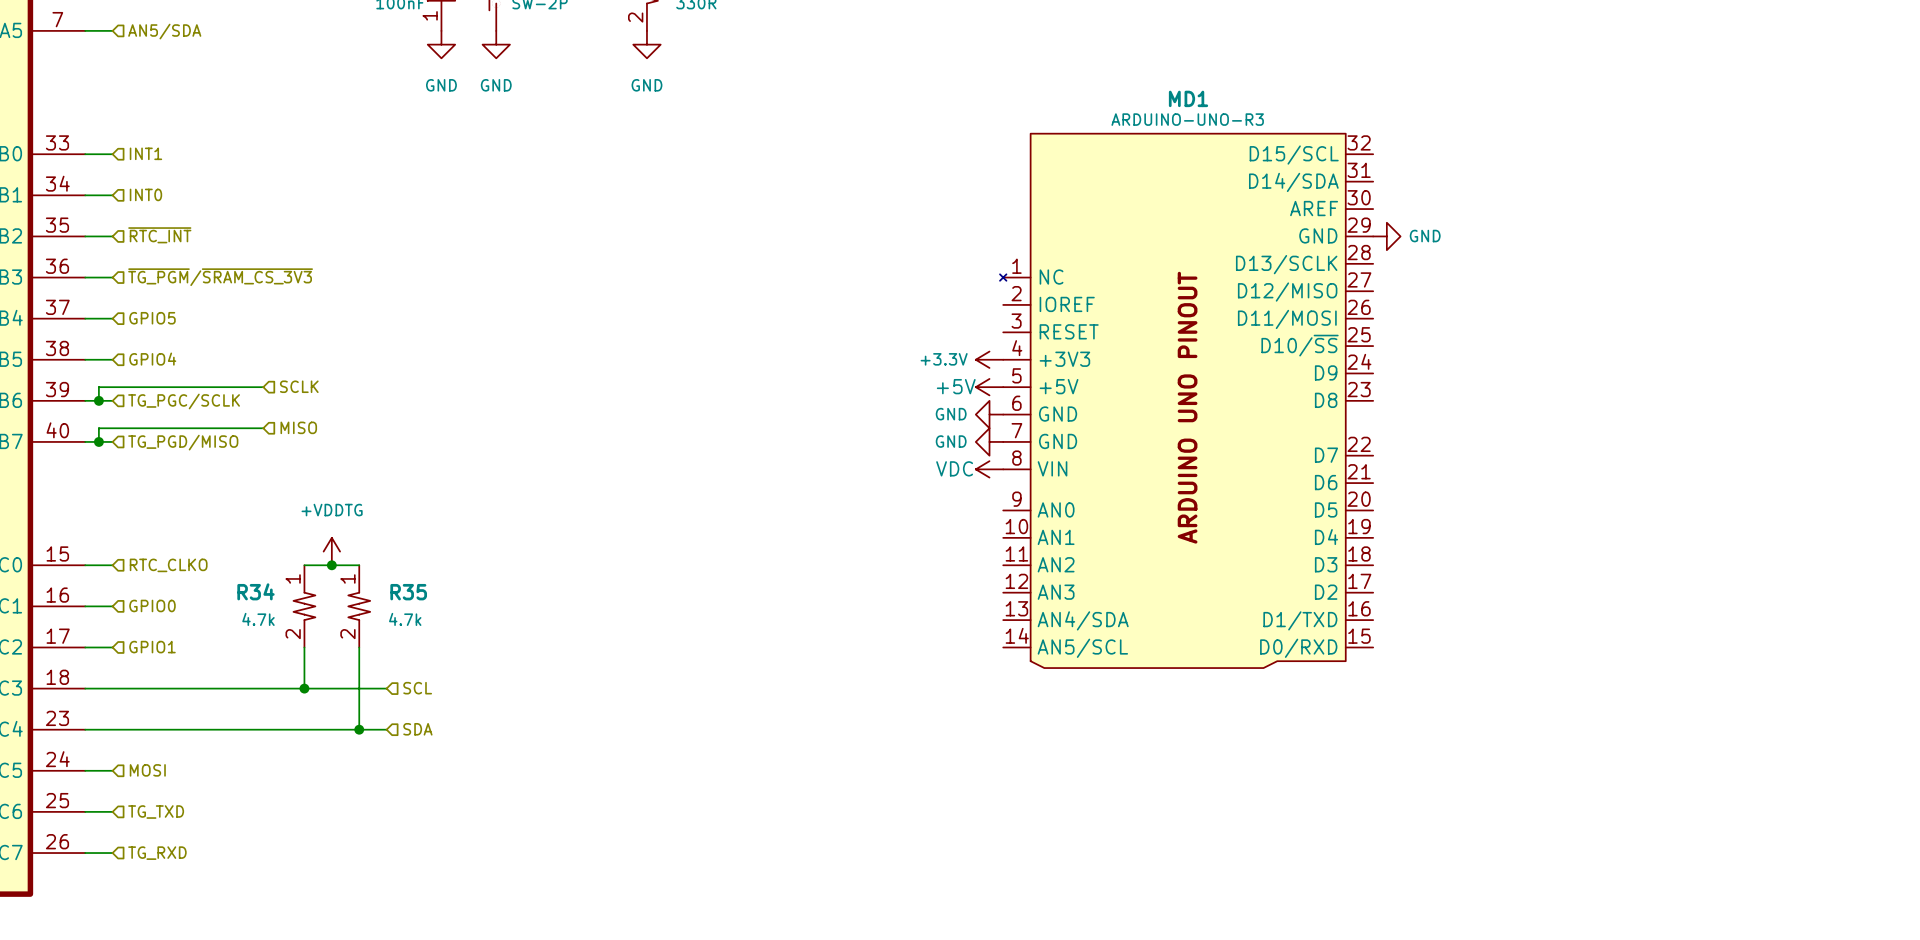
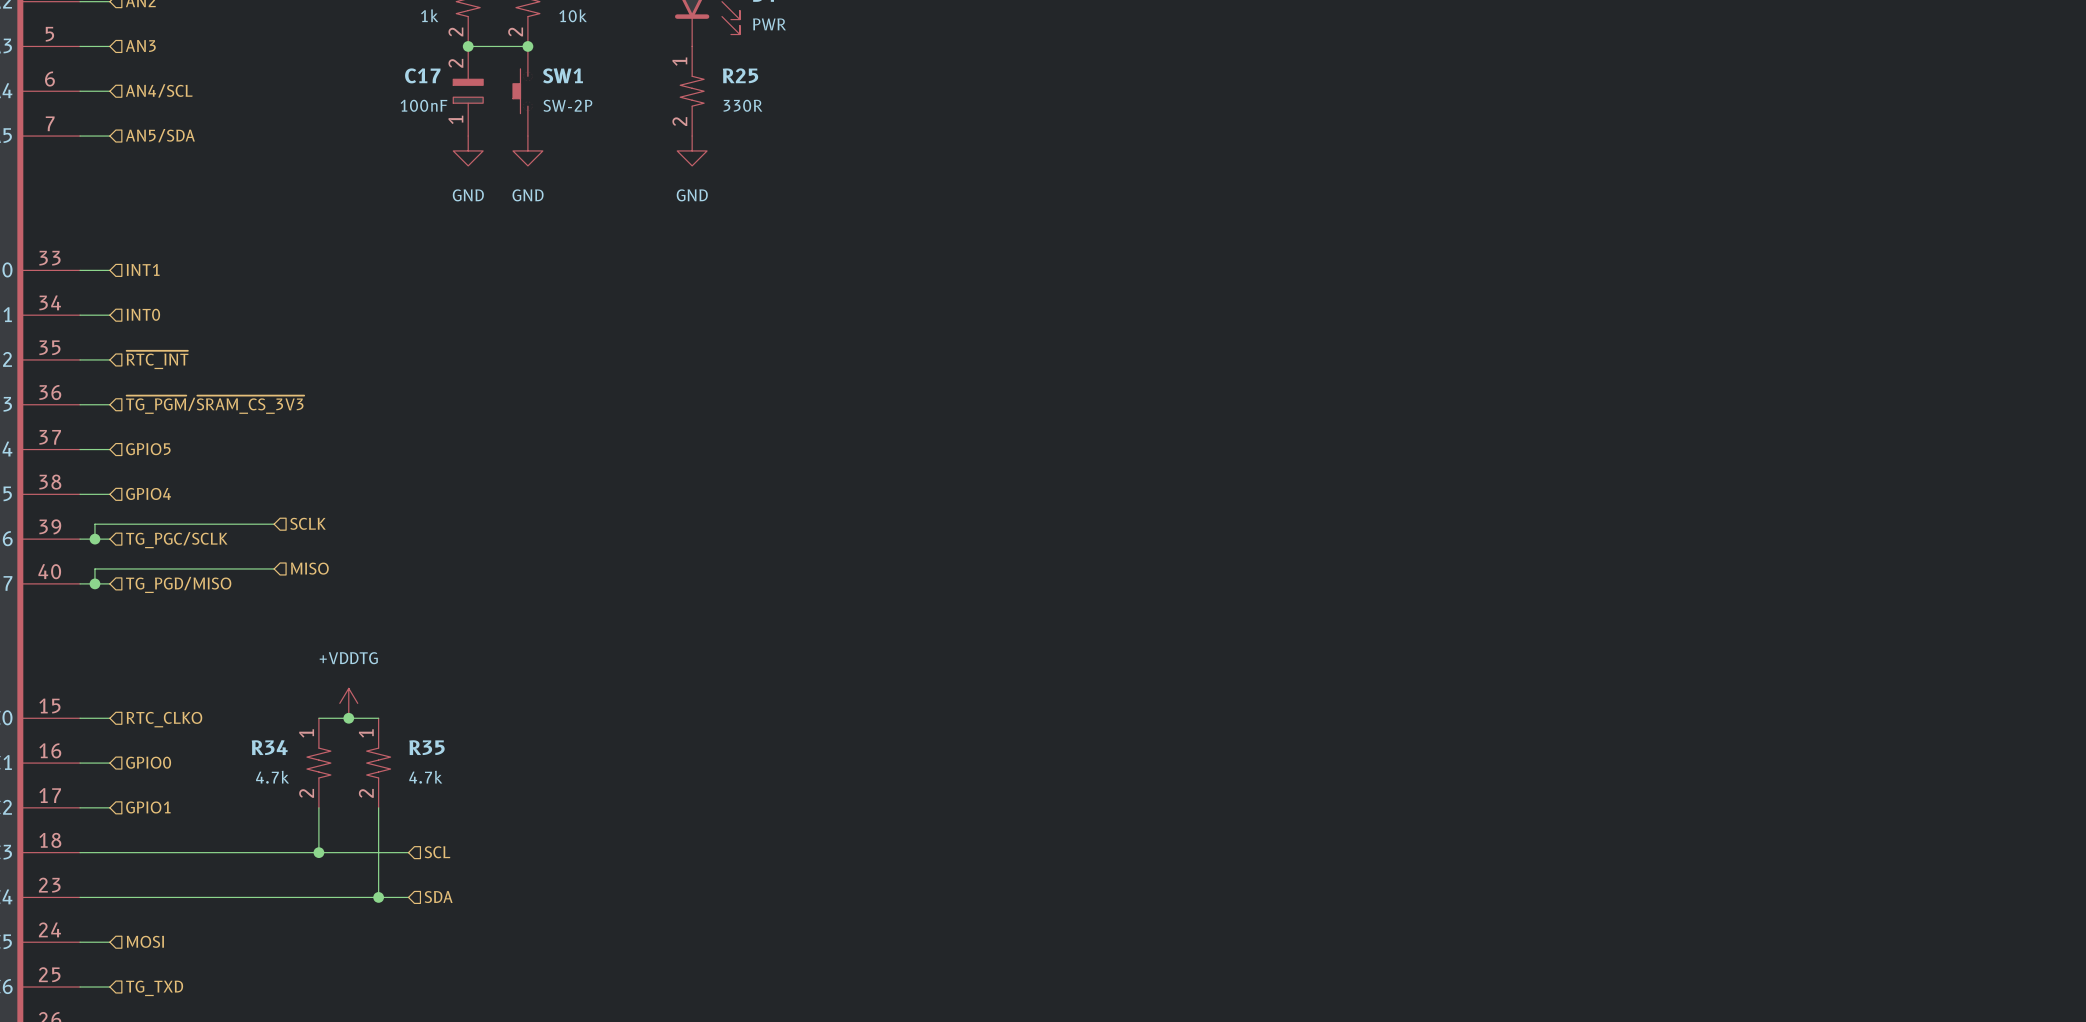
power symbol: GND (1386, 236) -> none
power symbol: +3.3V (989, 359) -> none
power symbol: +5V (989, 387) -> none
MD1: ARDUINO-UNO-R3 (1186, 400) -> none
power symbol: GND (989, 414) -> none
power symbol: GND (989, 441) -> none
power symbol: VDC (989, 469) -> none

